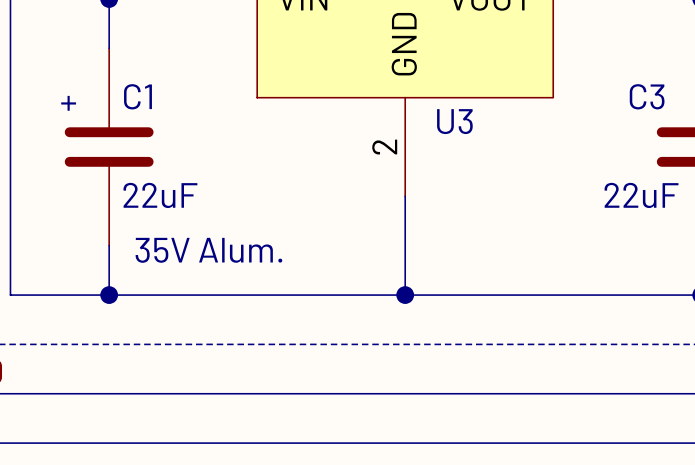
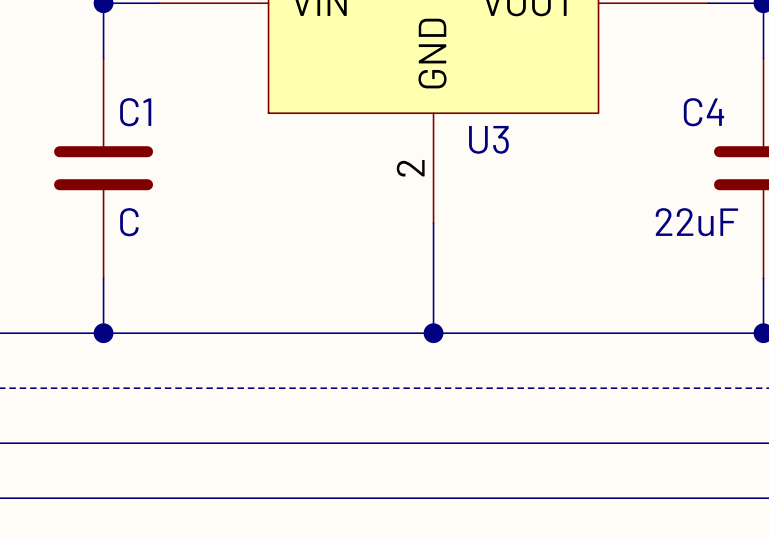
C3 name: C3 (647, 96) -> C4 (703, 112)
text: + (68, 103) -> none
C1 value: 22uF (160, 195) -> C (129, 222)
text: 35V Alum. (208, 250) -> none

